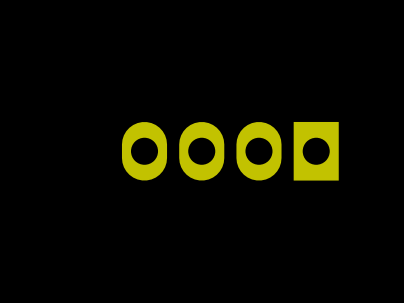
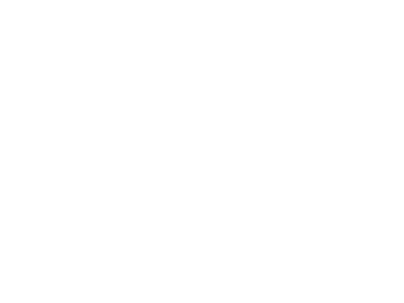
part: (230, 151) -> none

